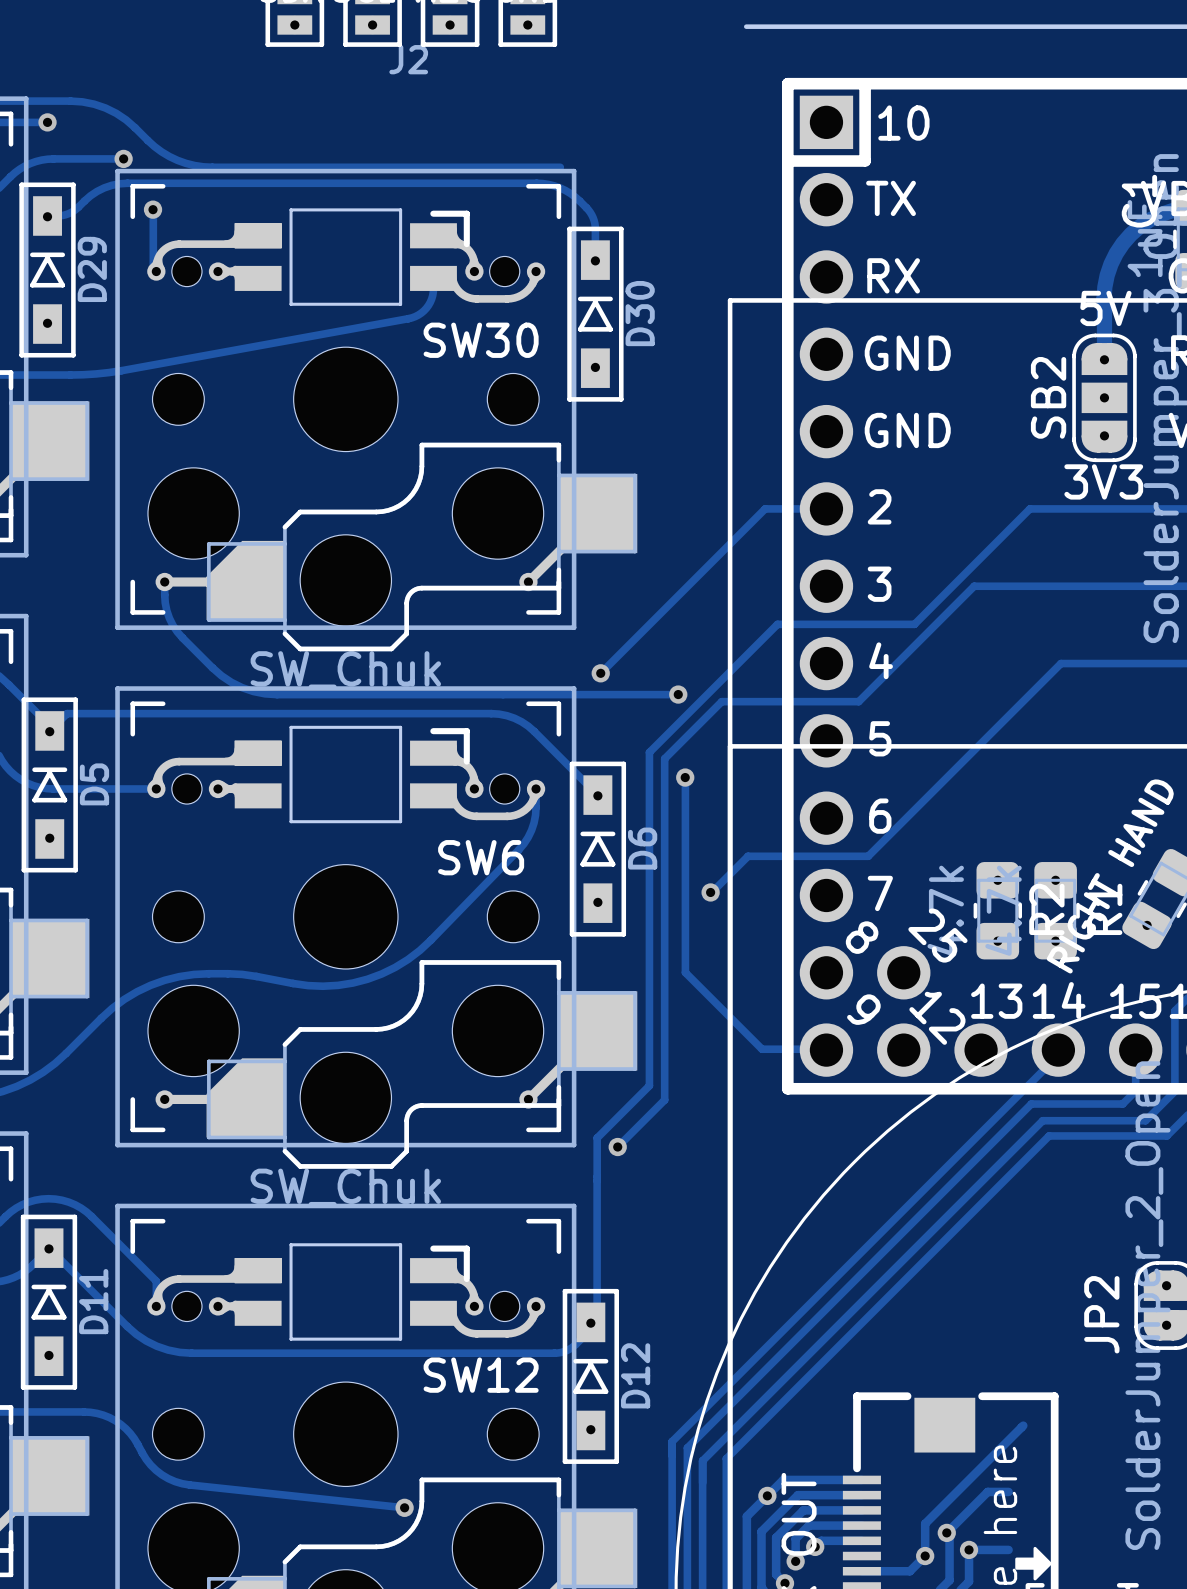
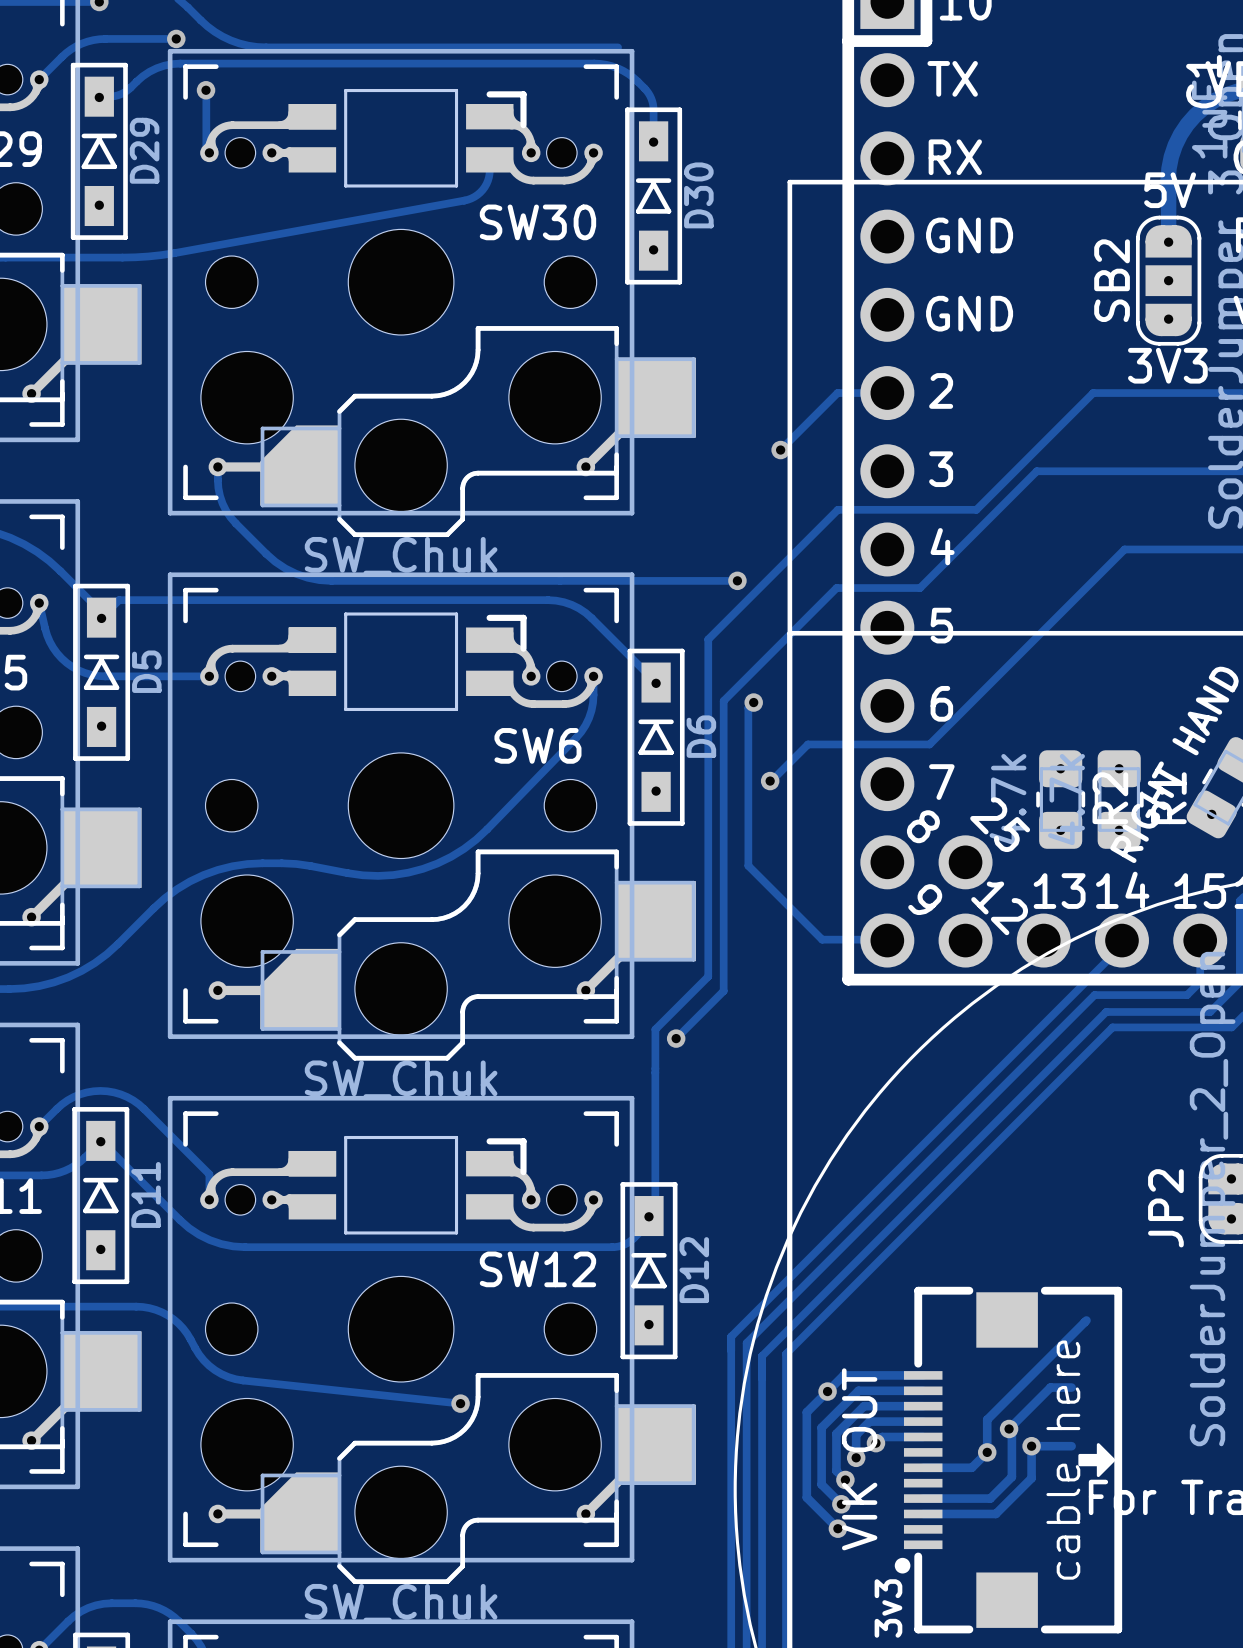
track: (777, 508) (765, 508) (600, 673) -> (837, 393) (780, 450)
via: none -> (780, 450)
via: (600, 673) -> none
track: (776, 701) (721, 701) (664, 758) (664, 813) -> (836, 588) (723, 700)
track: (685, 777) (685, 972) (689, 976) -> (753, 702) (748, 707) (748, 865)
via position: (685, 777) -> (753, 702)

